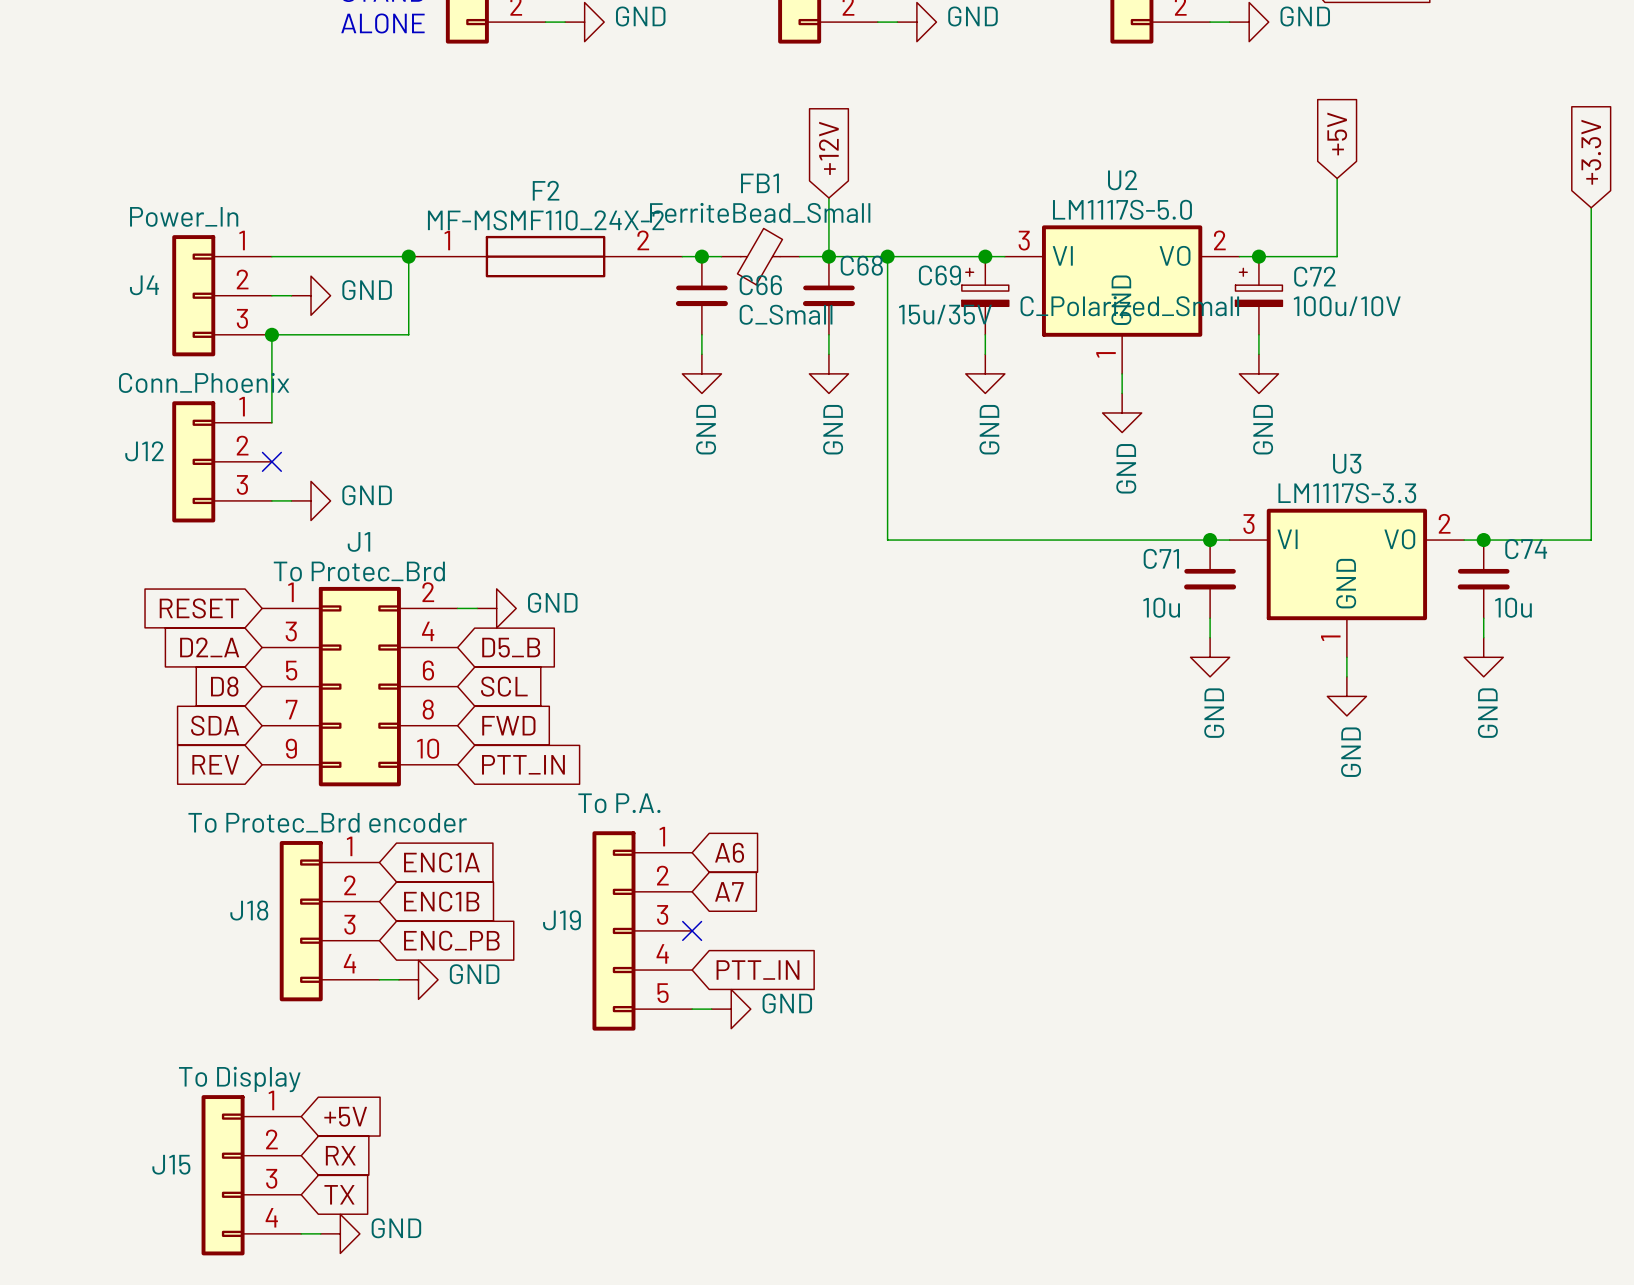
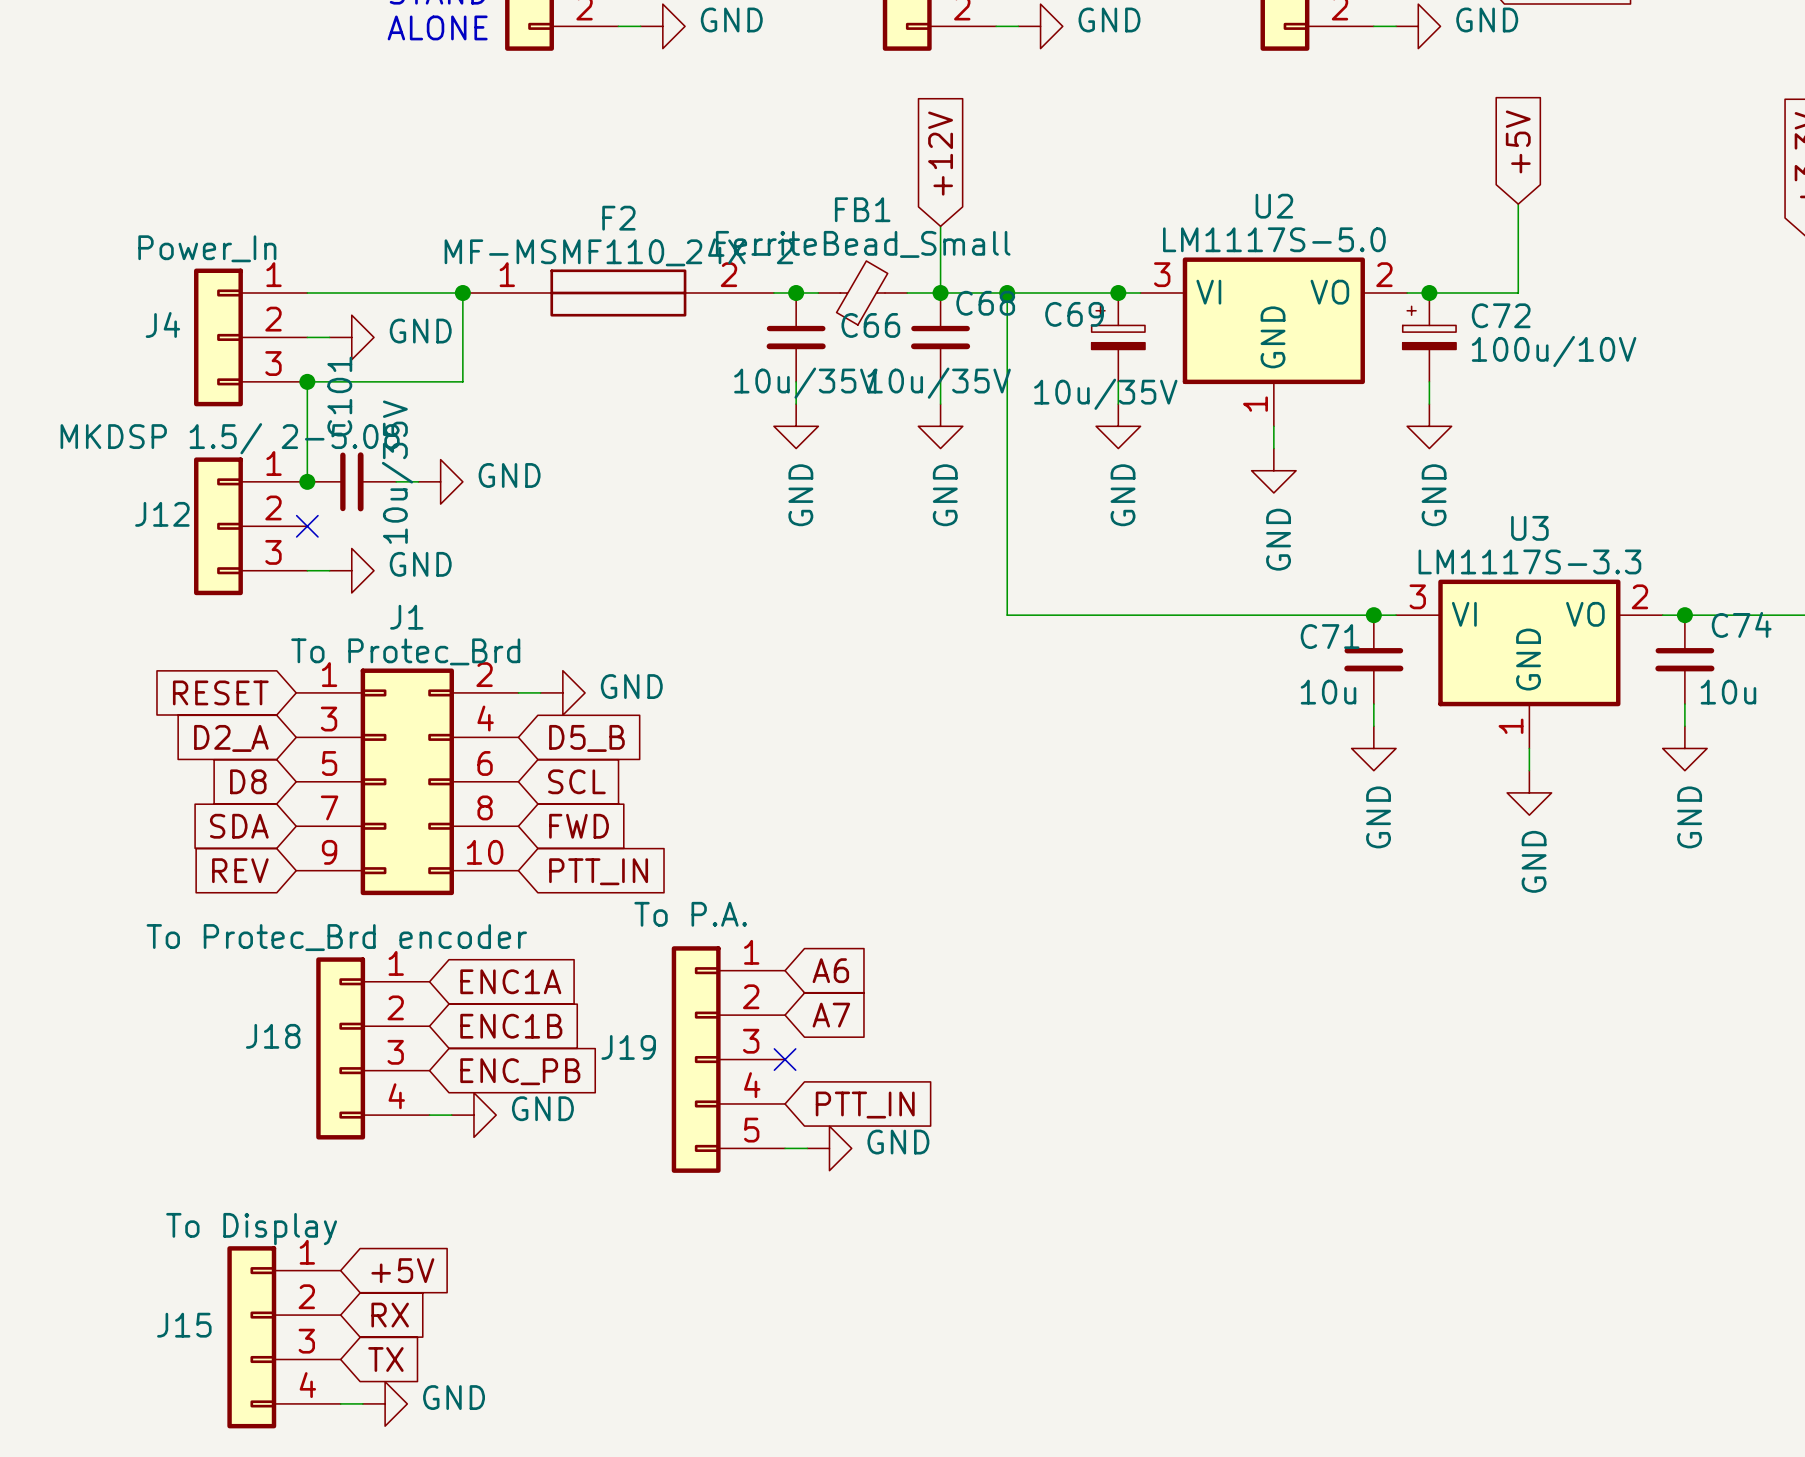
C69 value: C_Polarized_Small (1129, 306) -> 10u/35V (1105, 394)
C66 value: C_Small (786, 314) -> 10u/35V (805, 383)
C68 value: 15u/35V (945, 314) -> 10u/35V (939, 383)
J12 value: Conn_Phoenix (204, 382) -> MKDSP 1.5/ 2-5.08 (230, 438)
junction: none -> (307, 481)
C101: none -> 10u/35V (351, 481)
wire: none -> (396, 481) (418, 481)
power symbol: none -> GND (440, 481)

